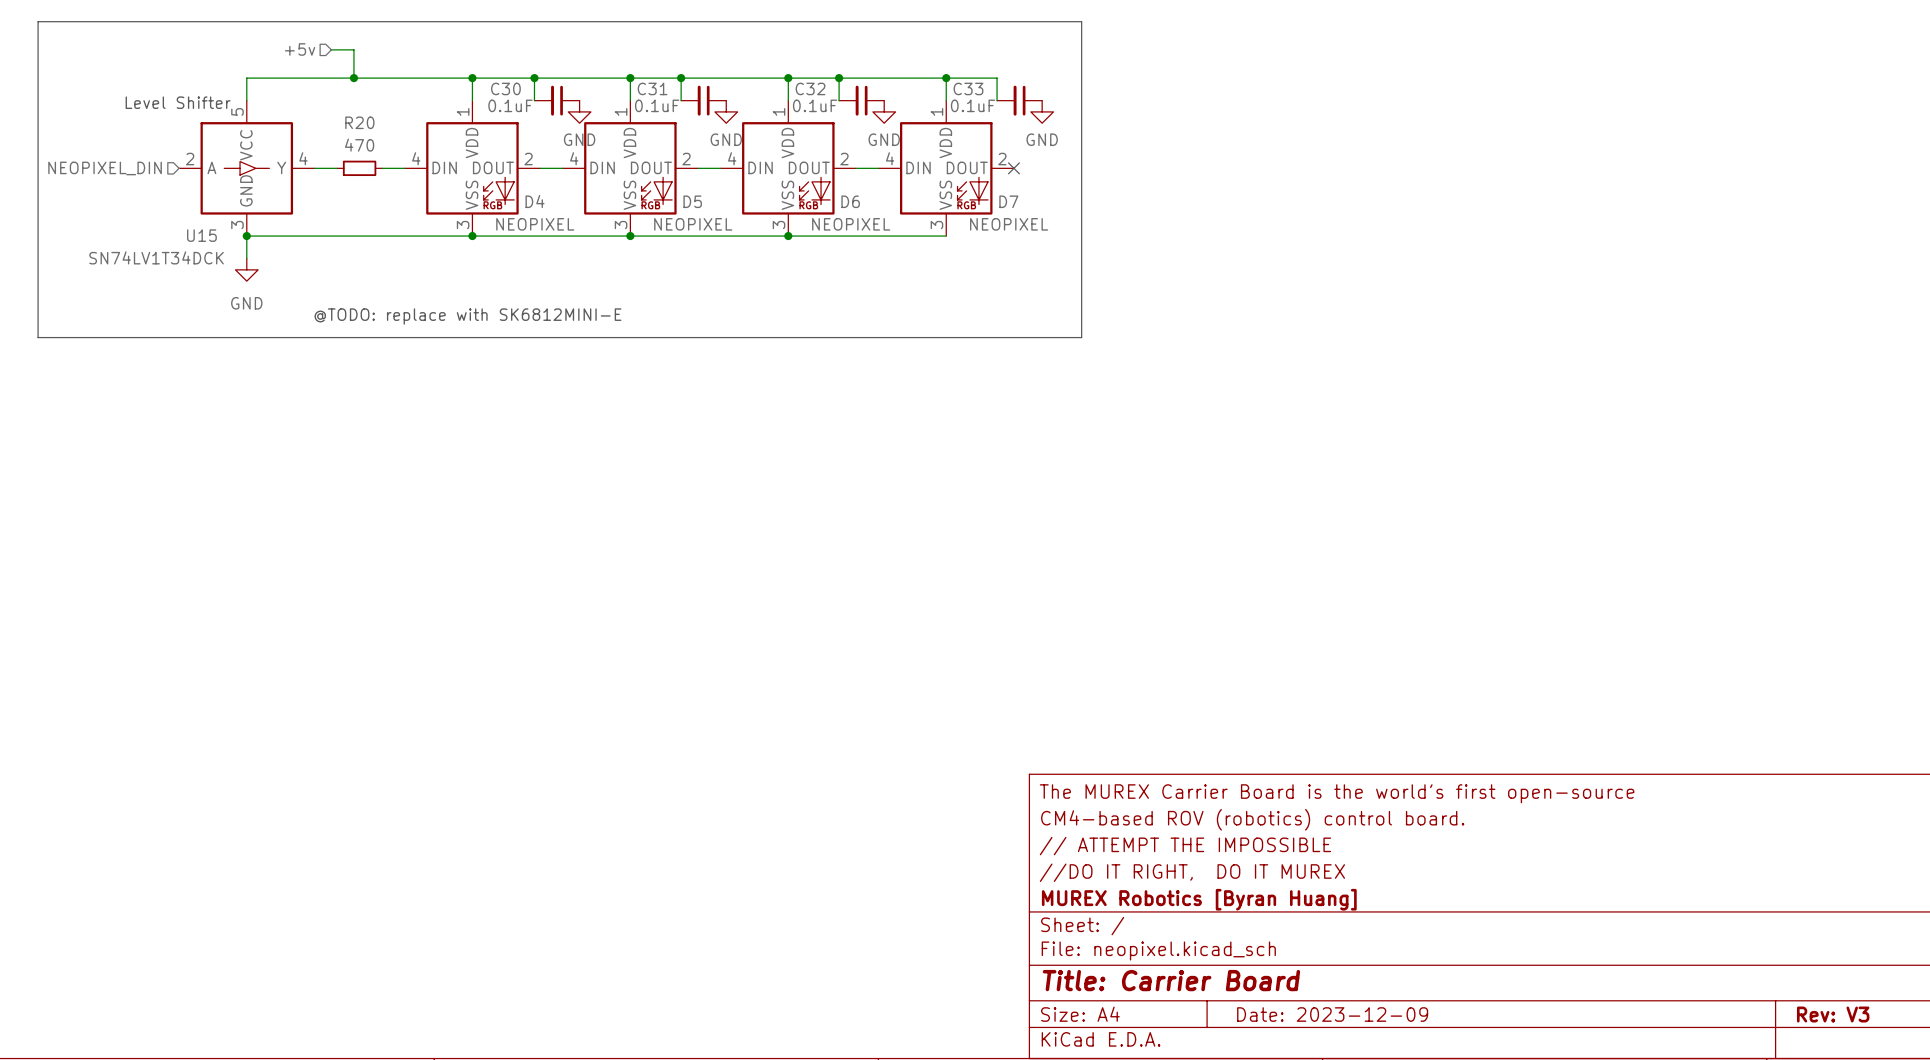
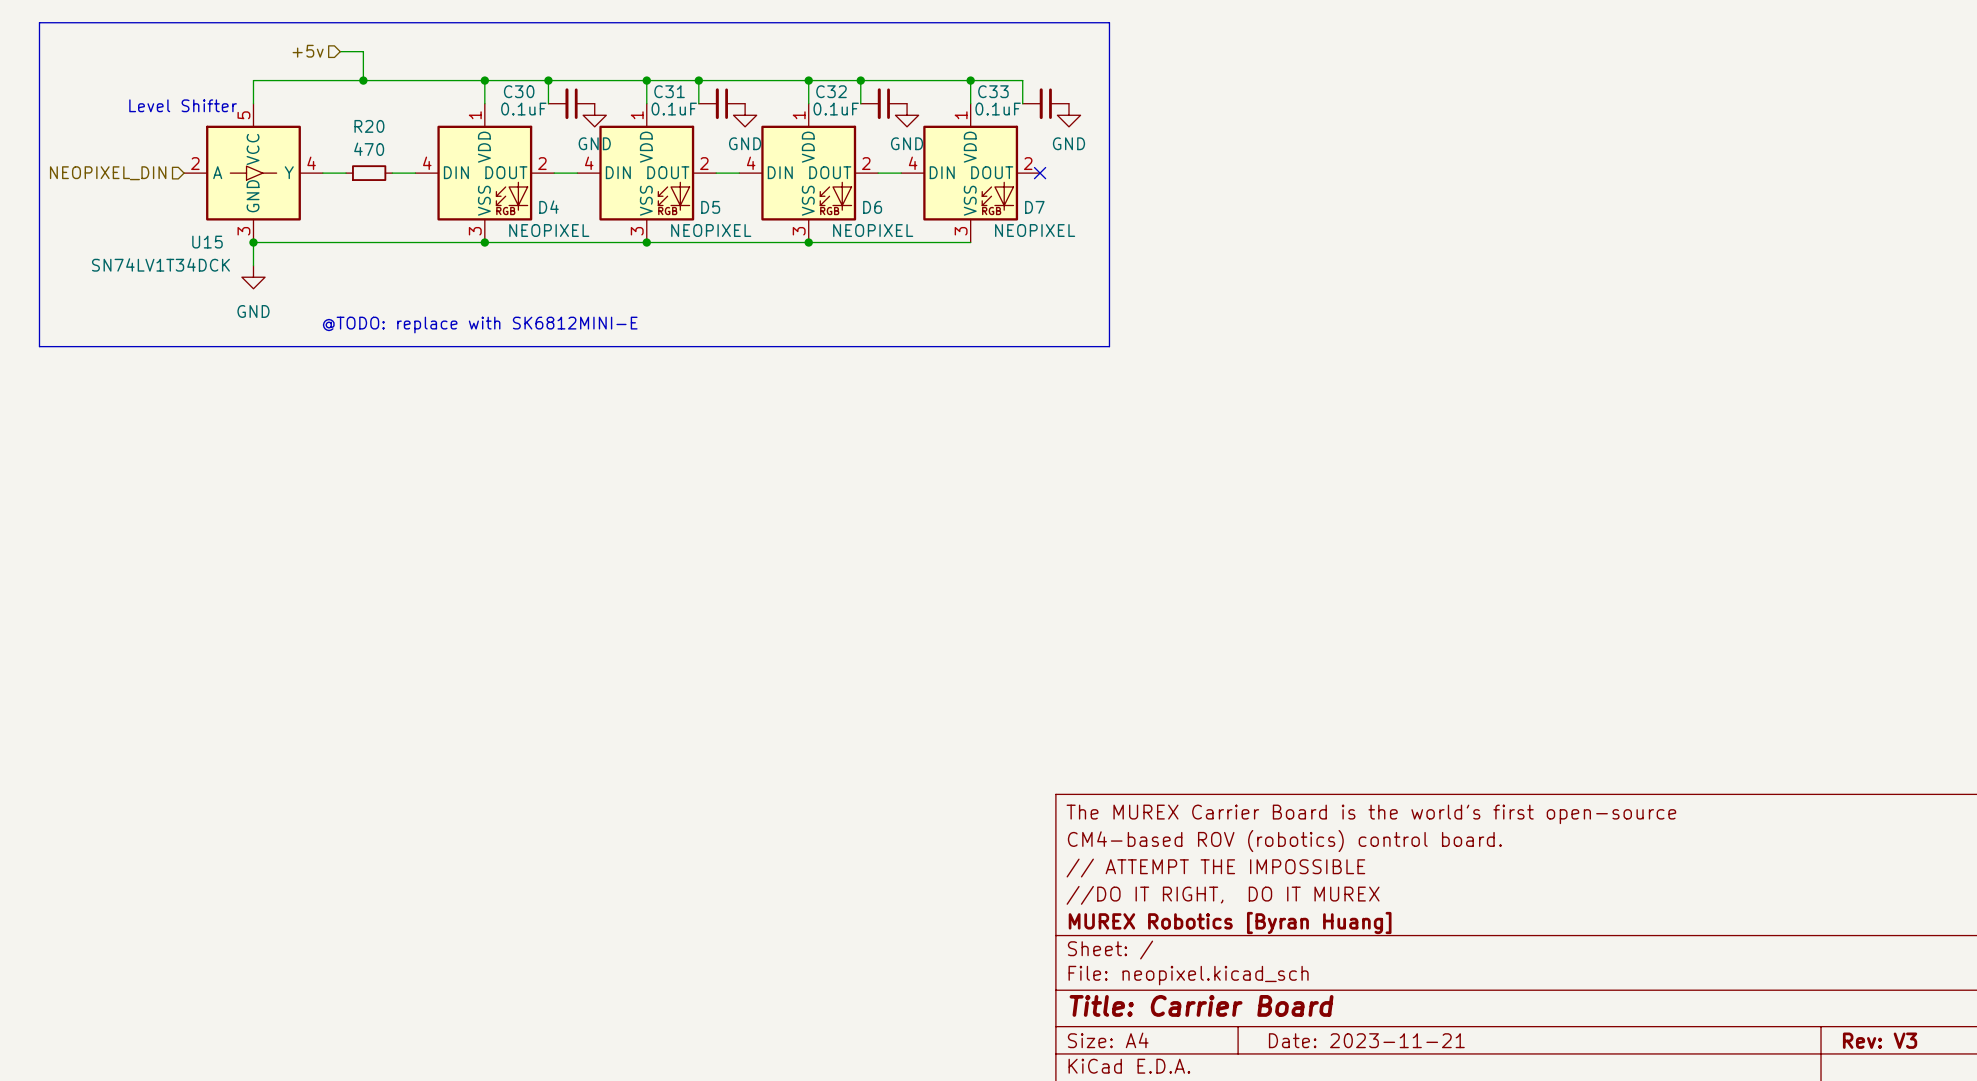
title block: Date: 2023-12-09 (1332, 1014) -> Date: 2023-11-21 (1366, 1040)

